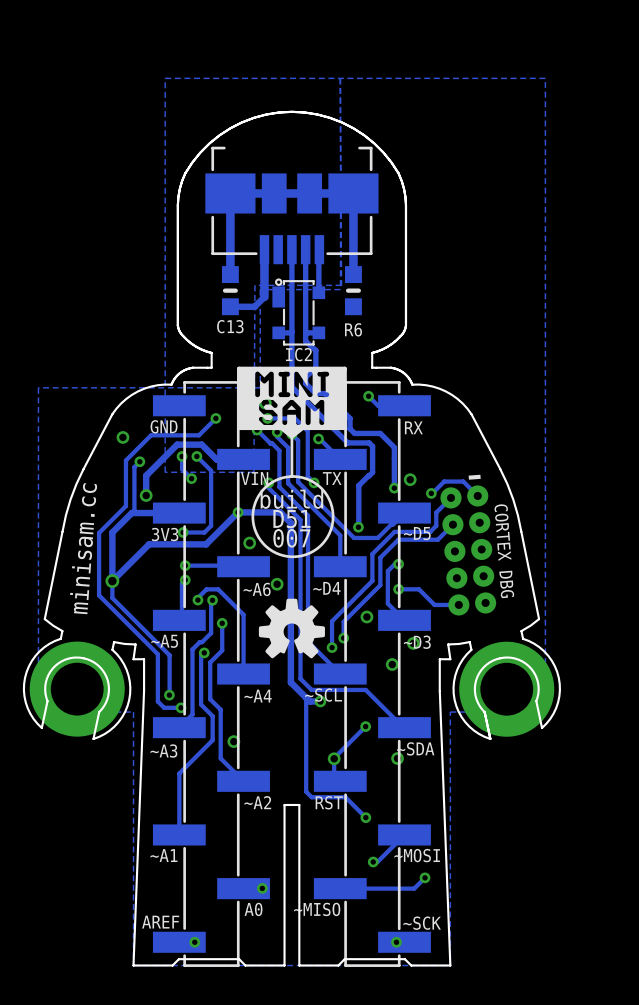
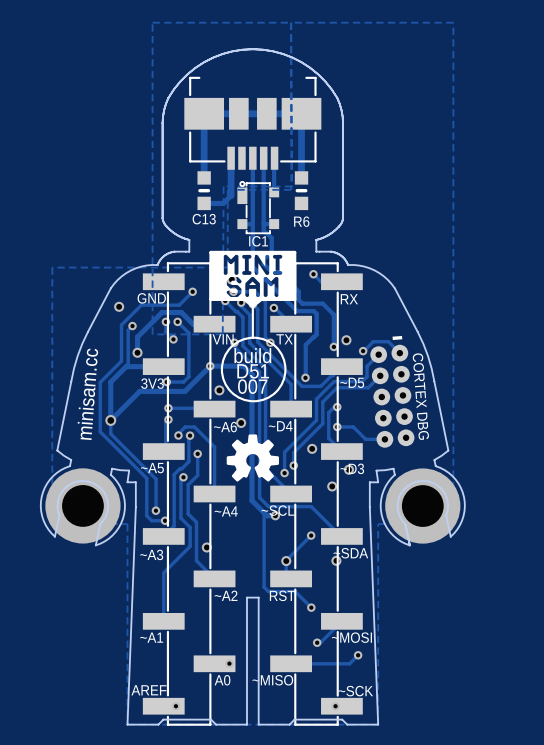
IC2 name: IC2 (298, 354) -> IC1 (258, 241)

